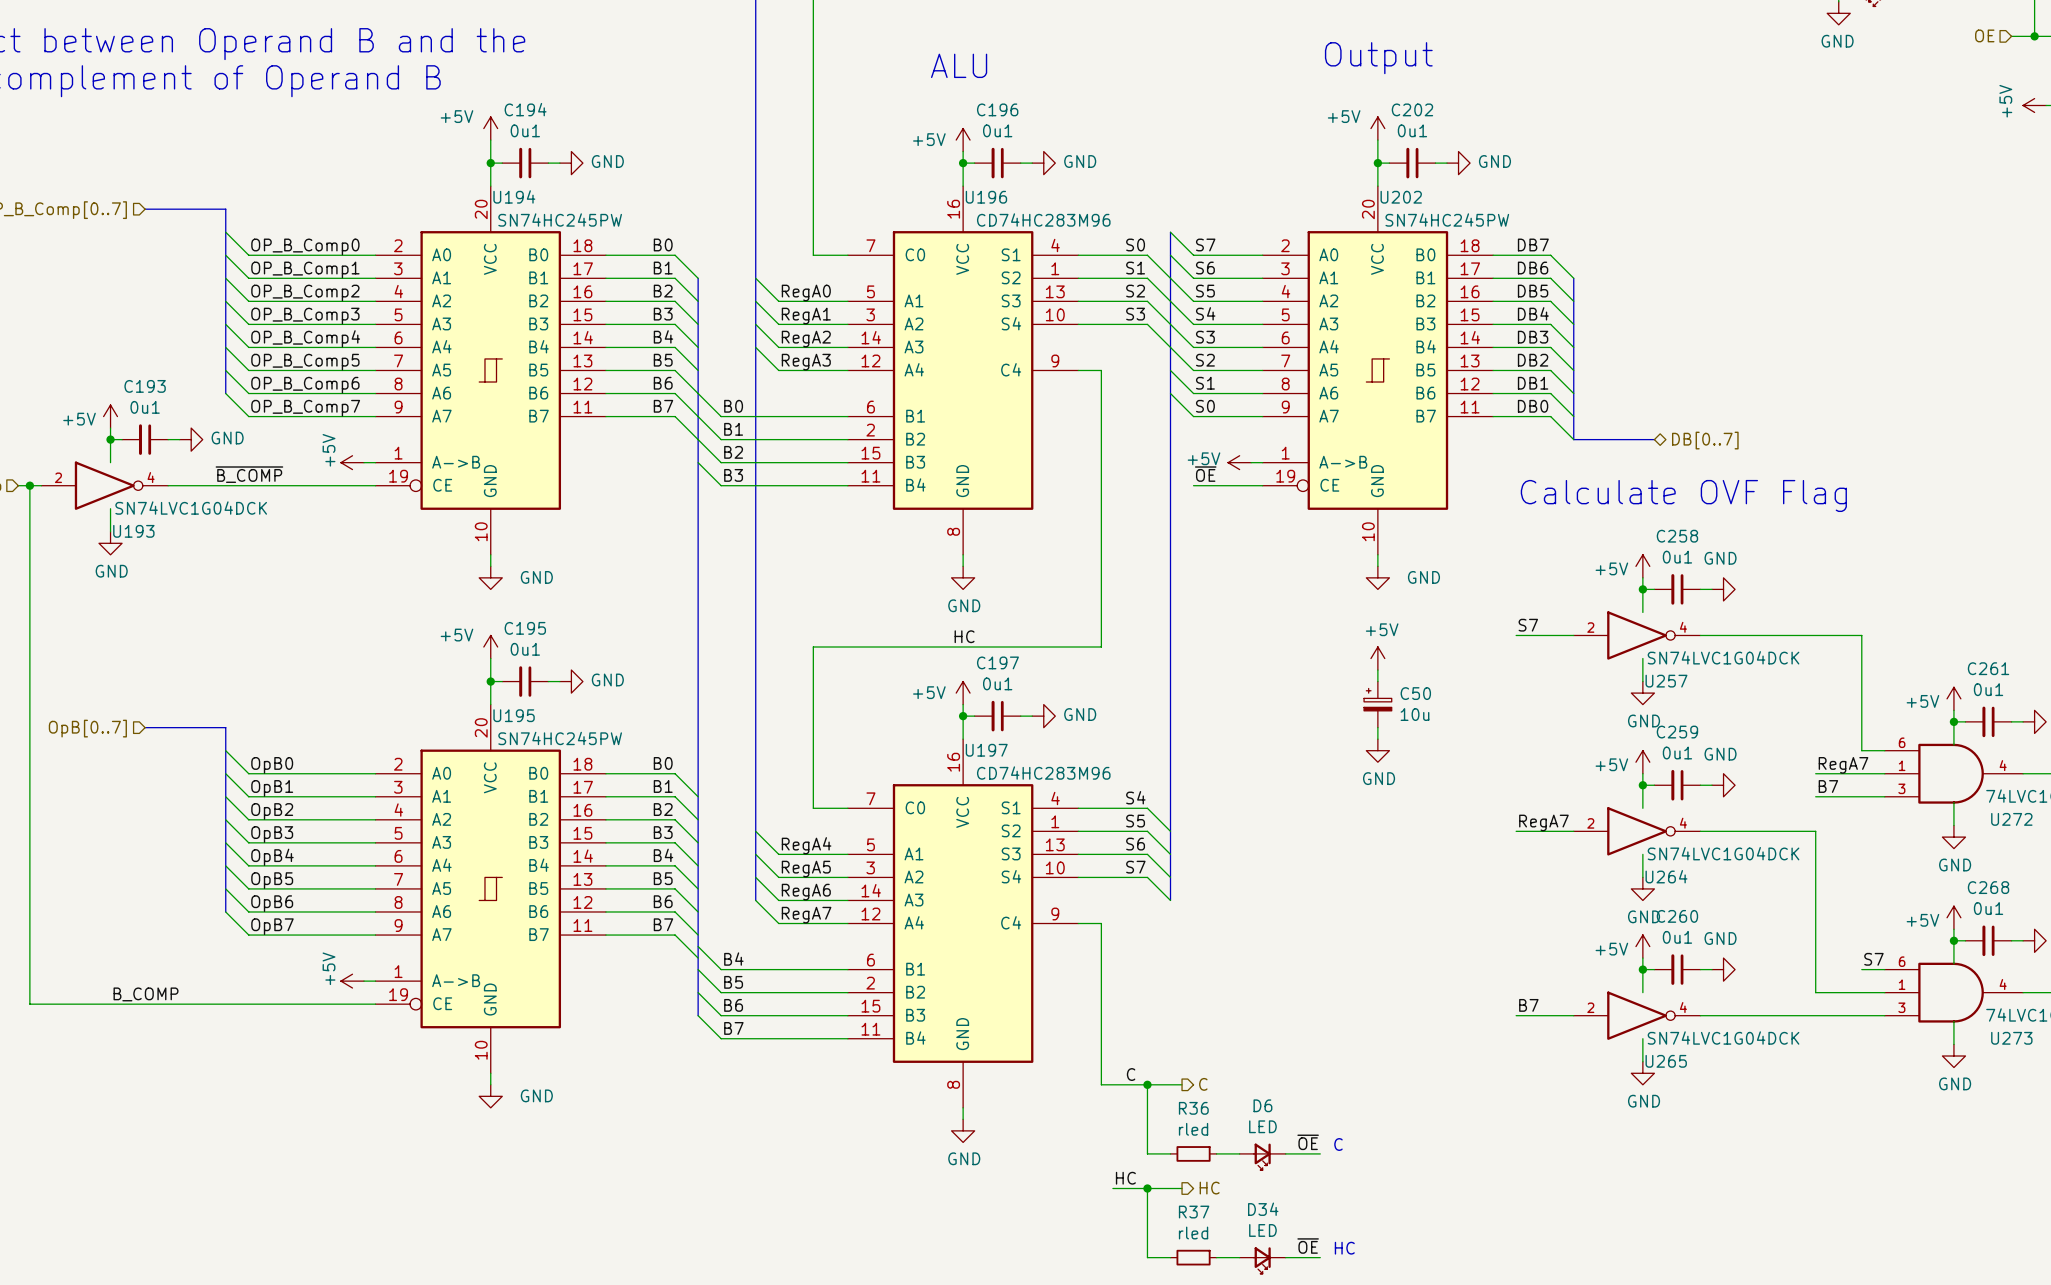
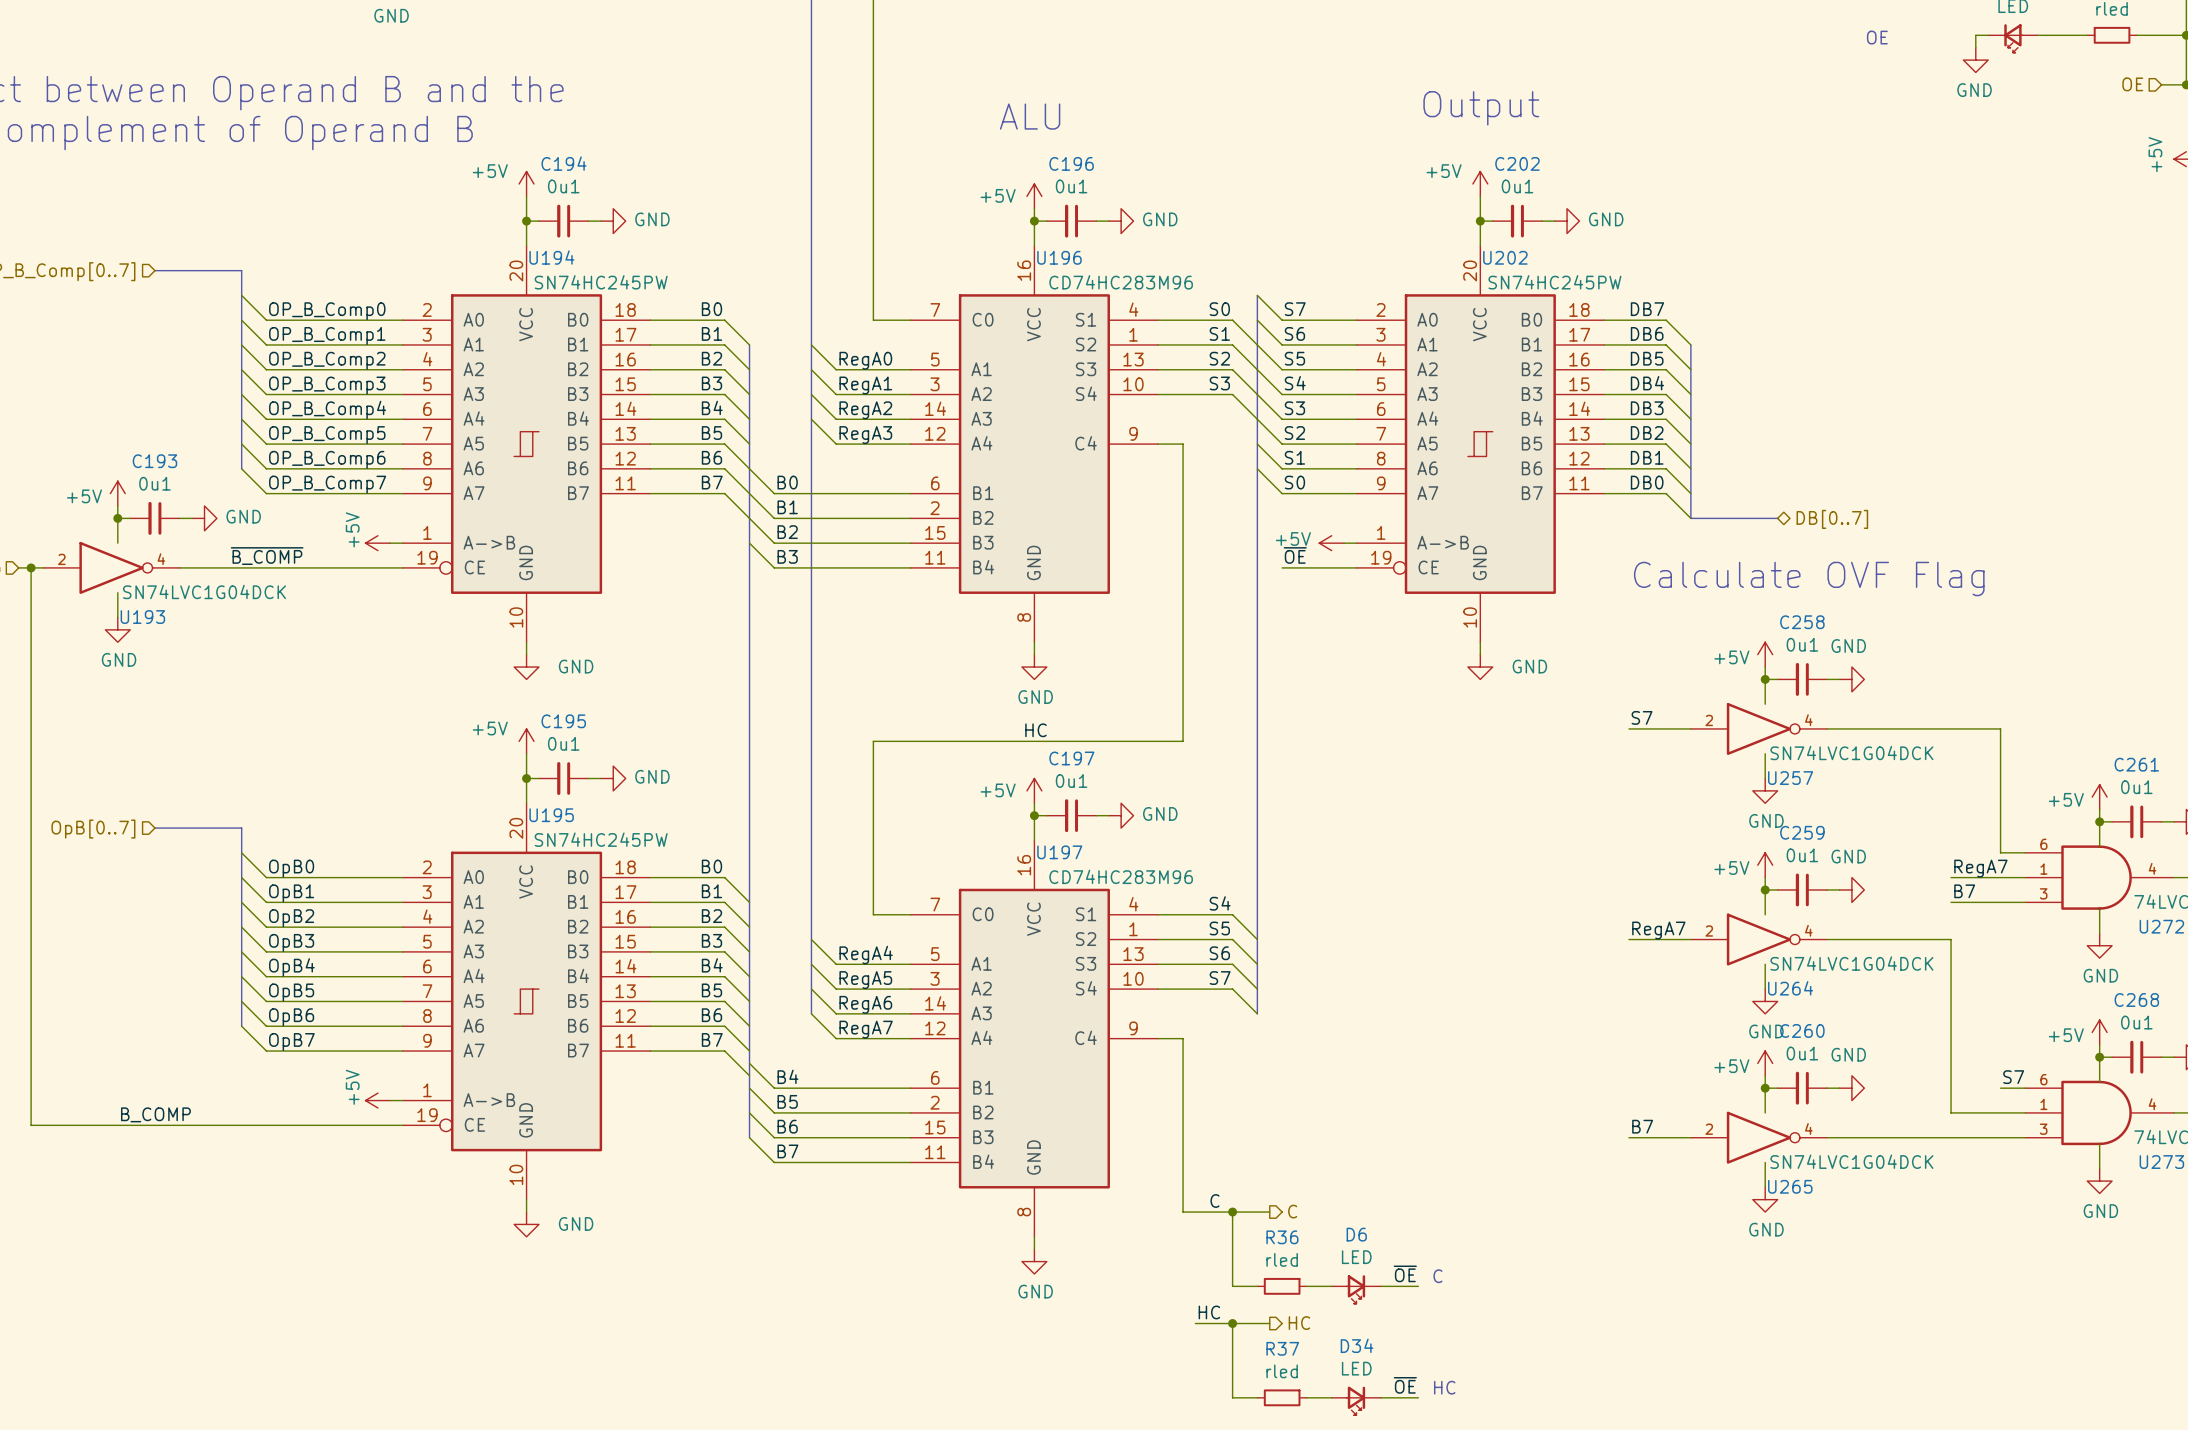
power symbol: +5V (1377, 658) -> none
wire: (1377, 670) (1377, 681) -> none
C50: 10u (1377, 704) -> none
wire: (1377, 727) (1377, 739) -> none
power symbol: GND (1377, 750) -> none

